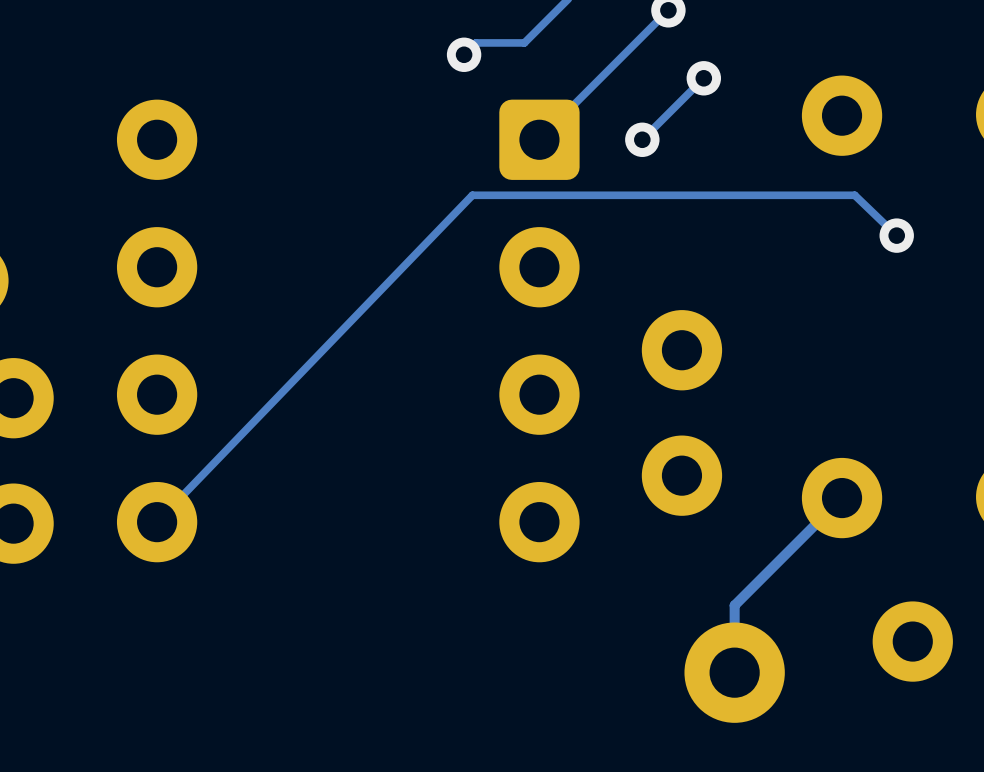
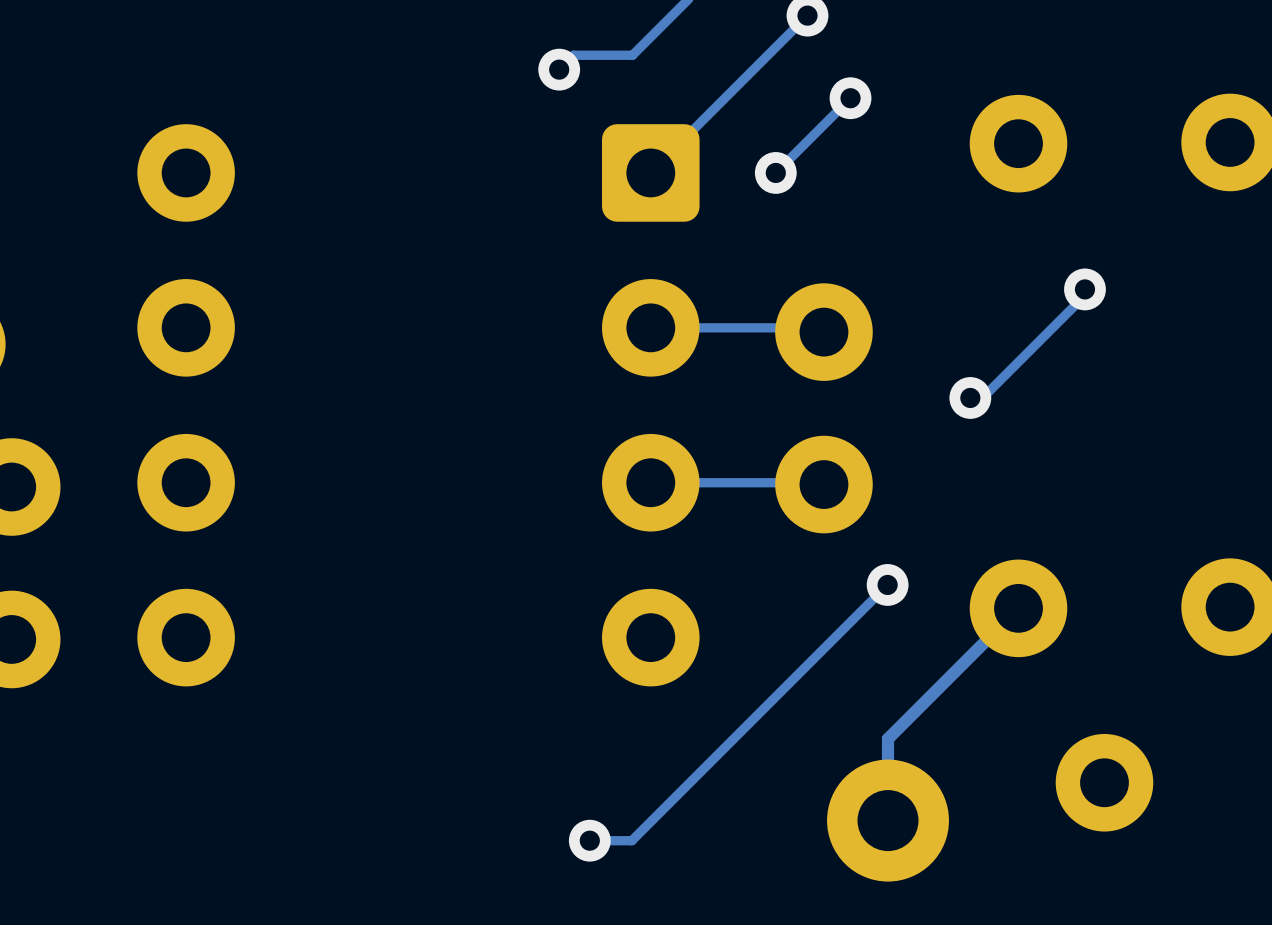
track: (896, 235) (854, 195) (472, 195) (157, 522) -> (1084, 289) (1084, 295) (982, 397) (970, 397)
track: none -> (819, 327) (650, 327)
via: none -> (970, 397)
track: none -> (822, 482) (650, 482)
part position: (681, 412) -> (823, 408)
track: none -> (887, 584) (631, 840) (589, 840)
via: none -> (887, 584)
via: none -> (589, 840)

